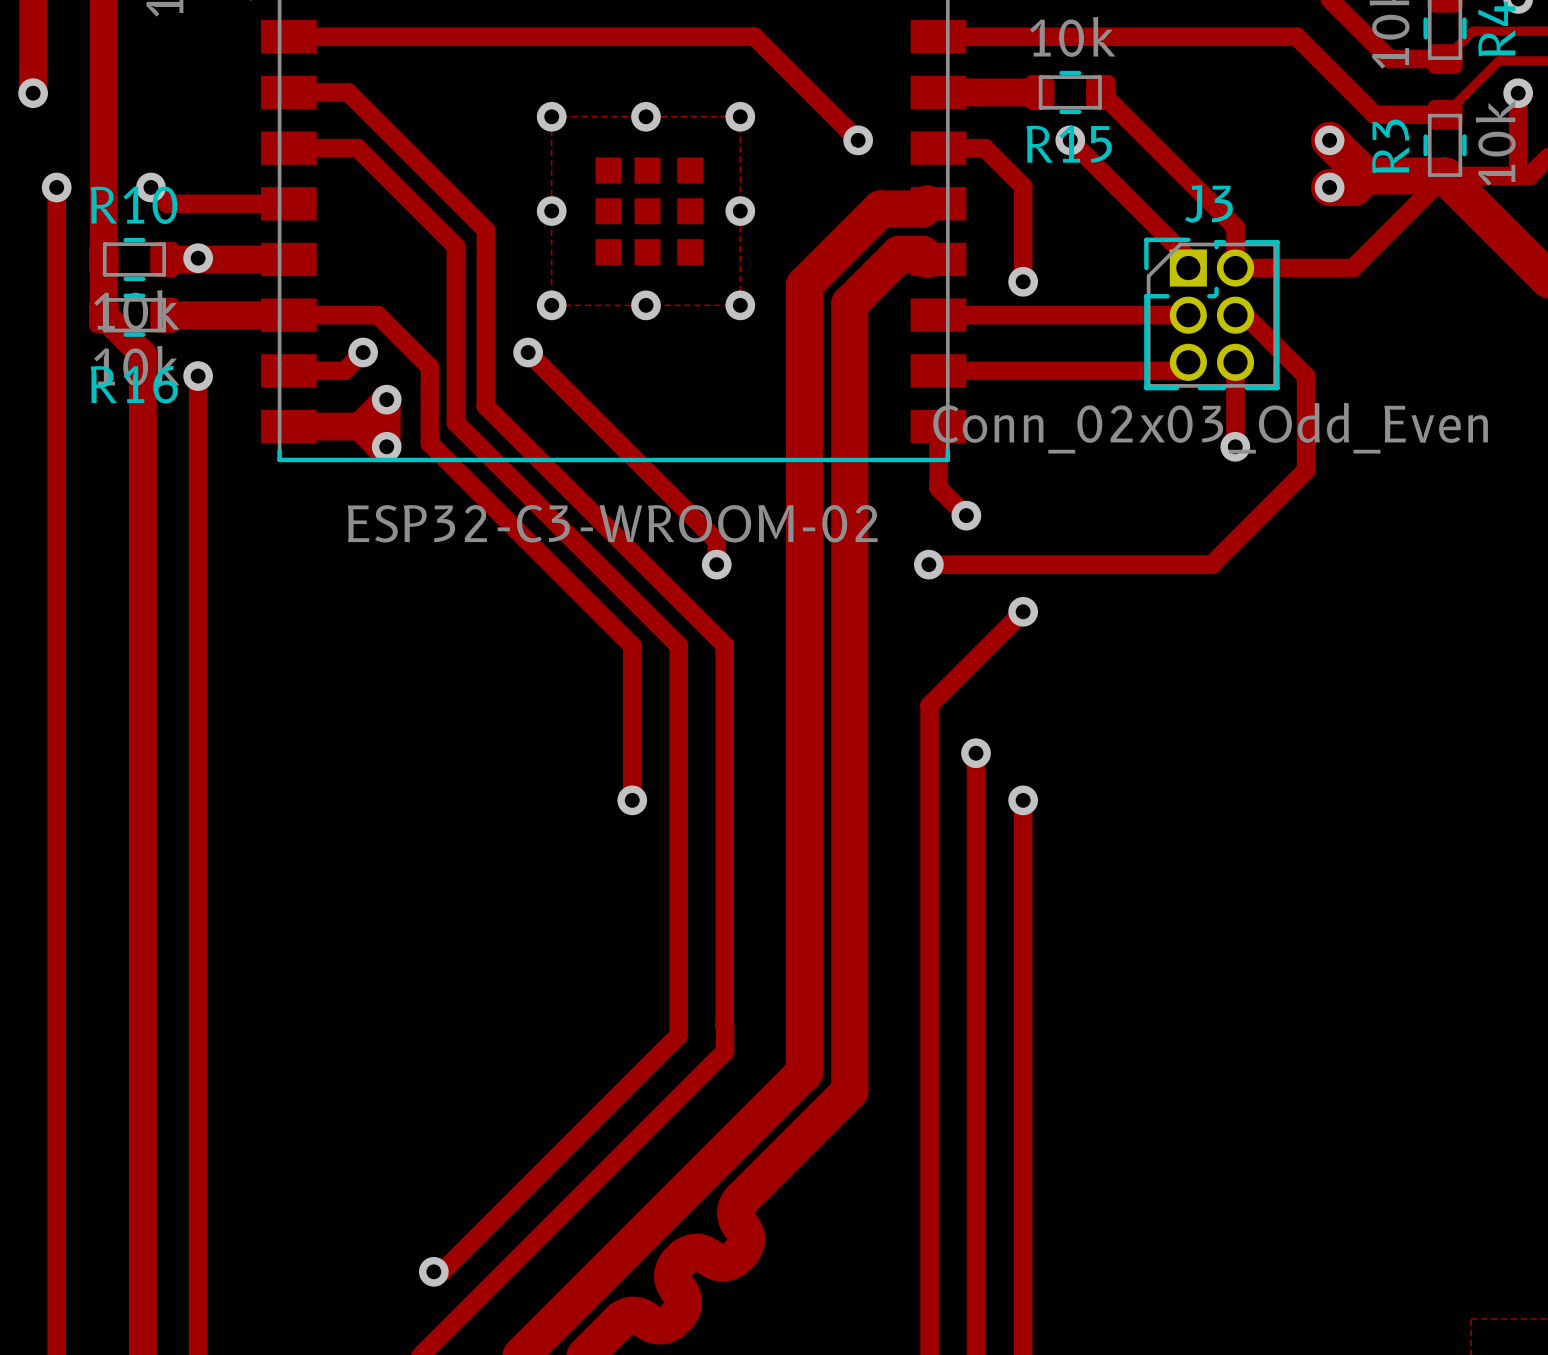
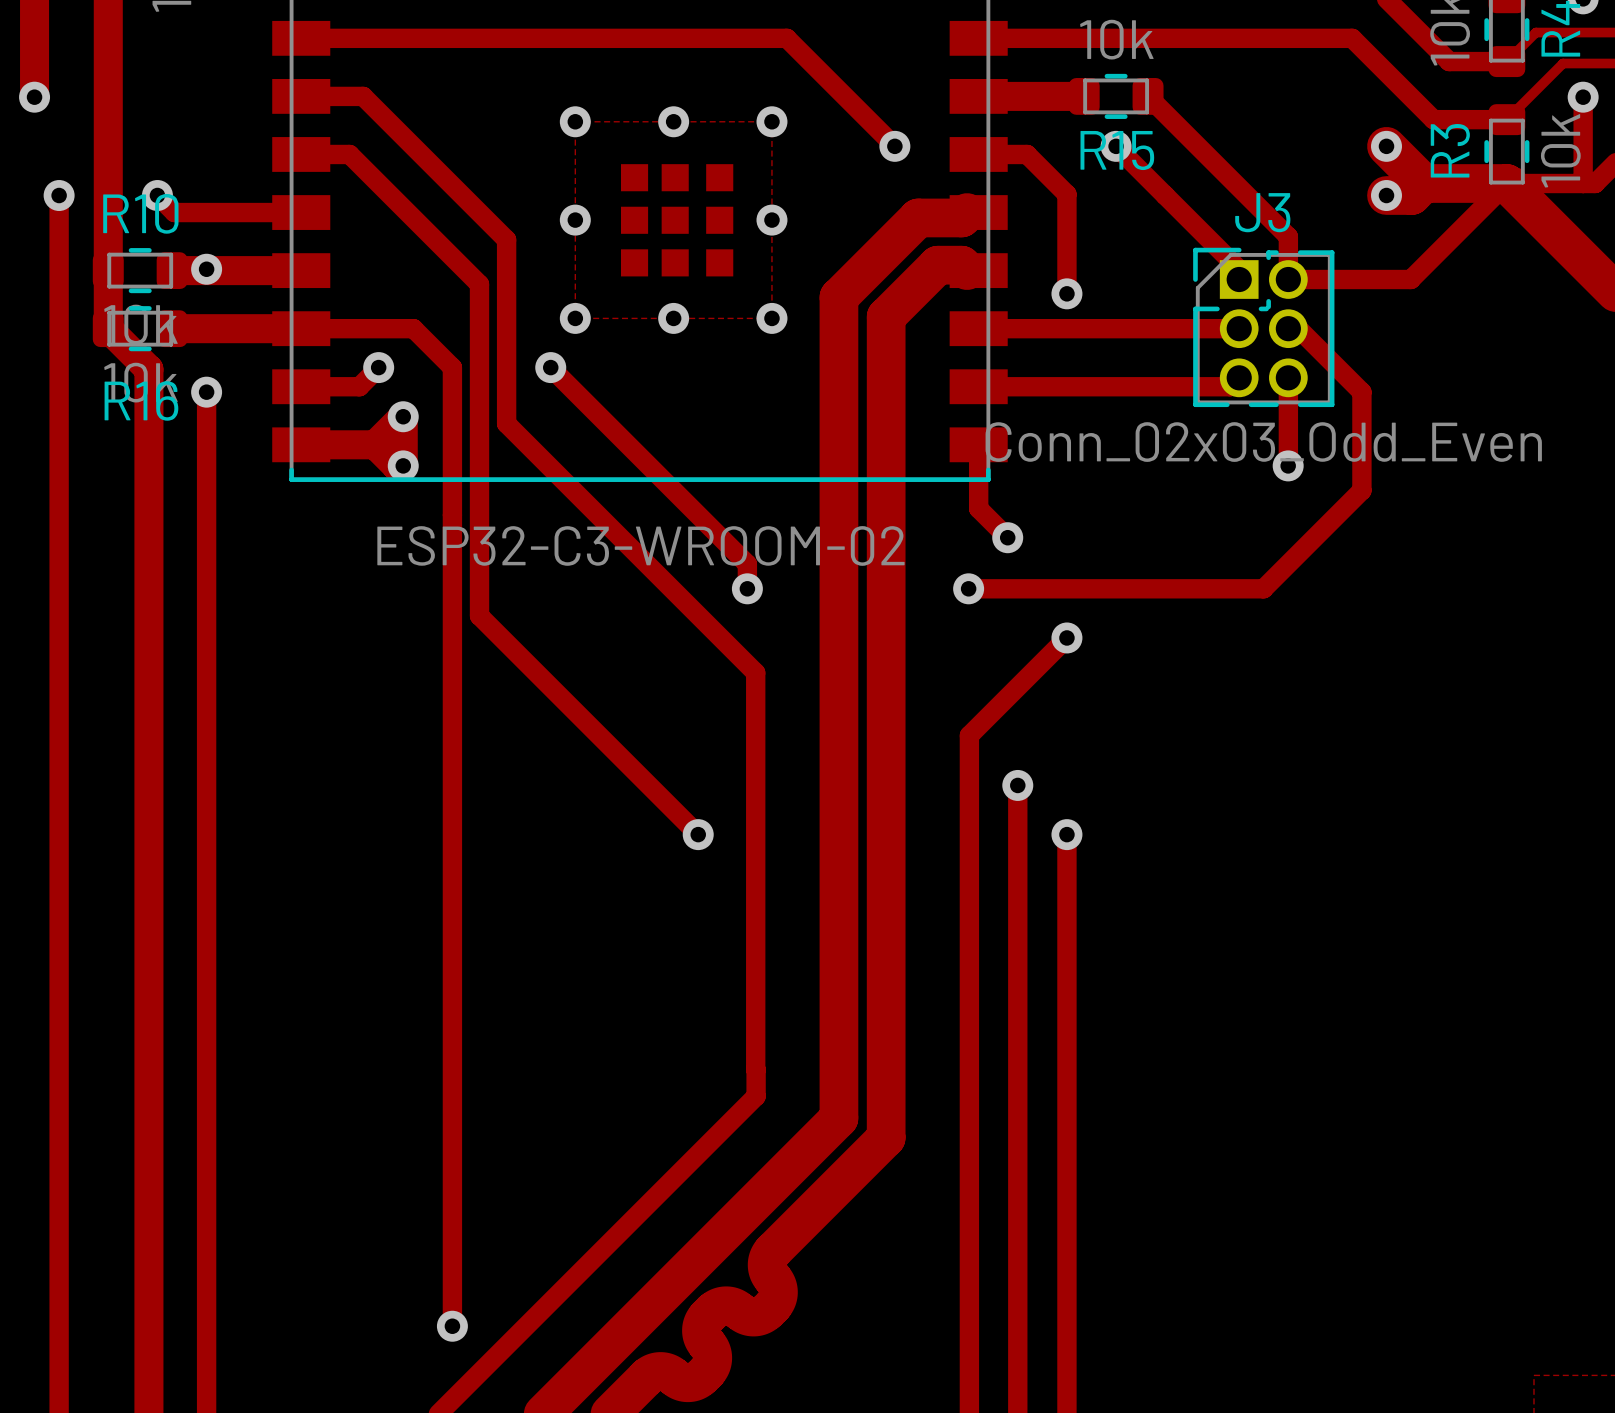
track: (335, 148) (357, 148) (455, 246) (455, 422) (678, 645) (678, 1035) (442, 1271) (433, 1271) -> (394, 328) (413, 328) (452, 367) (452, 1326)
track: none -> (349, 154) (479, 284) (479, 615) (698, 834)
track: (377, 315) (429, 367) (429, 443) (632, 645) (632, 800) -> none
via position: (632, 800) -> (698, 834)

